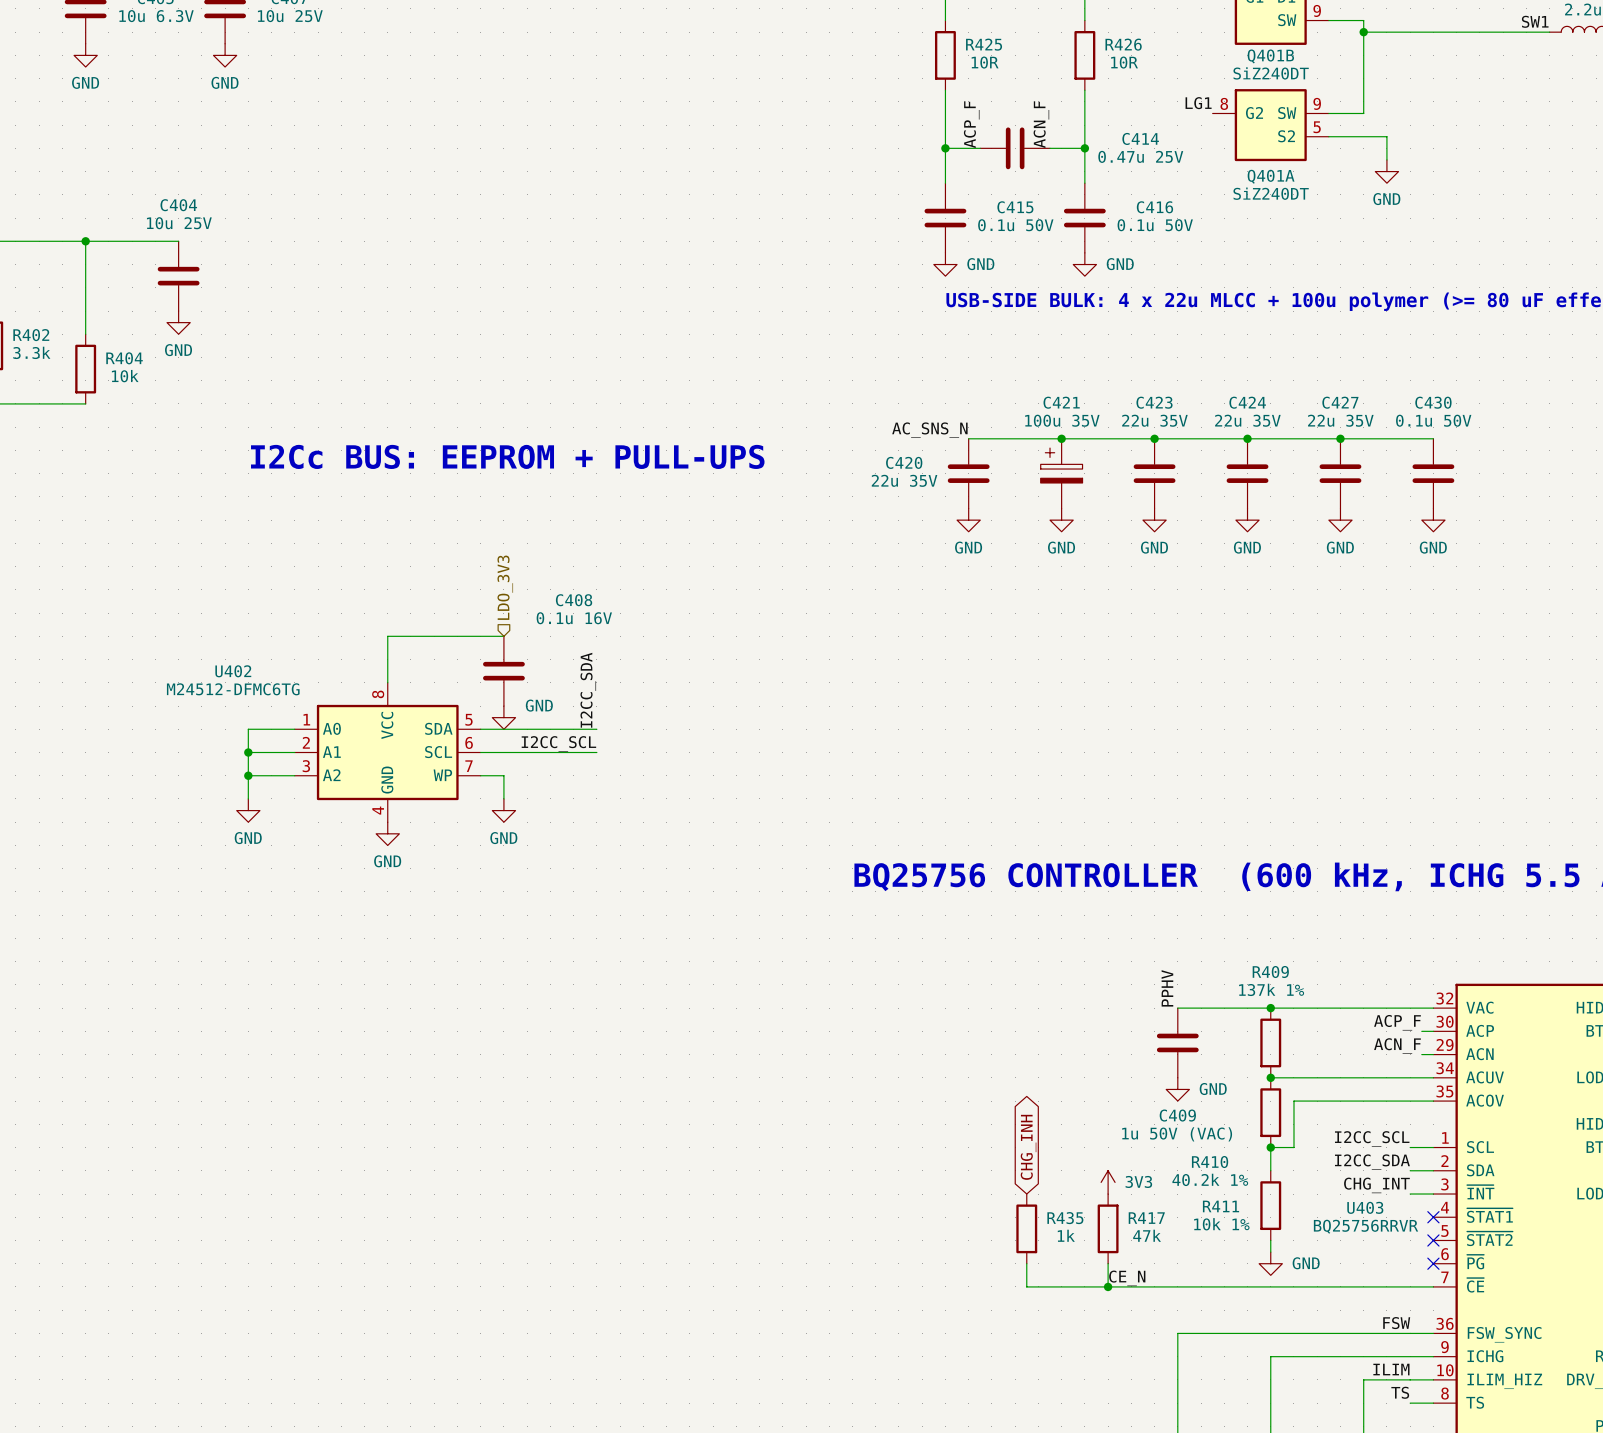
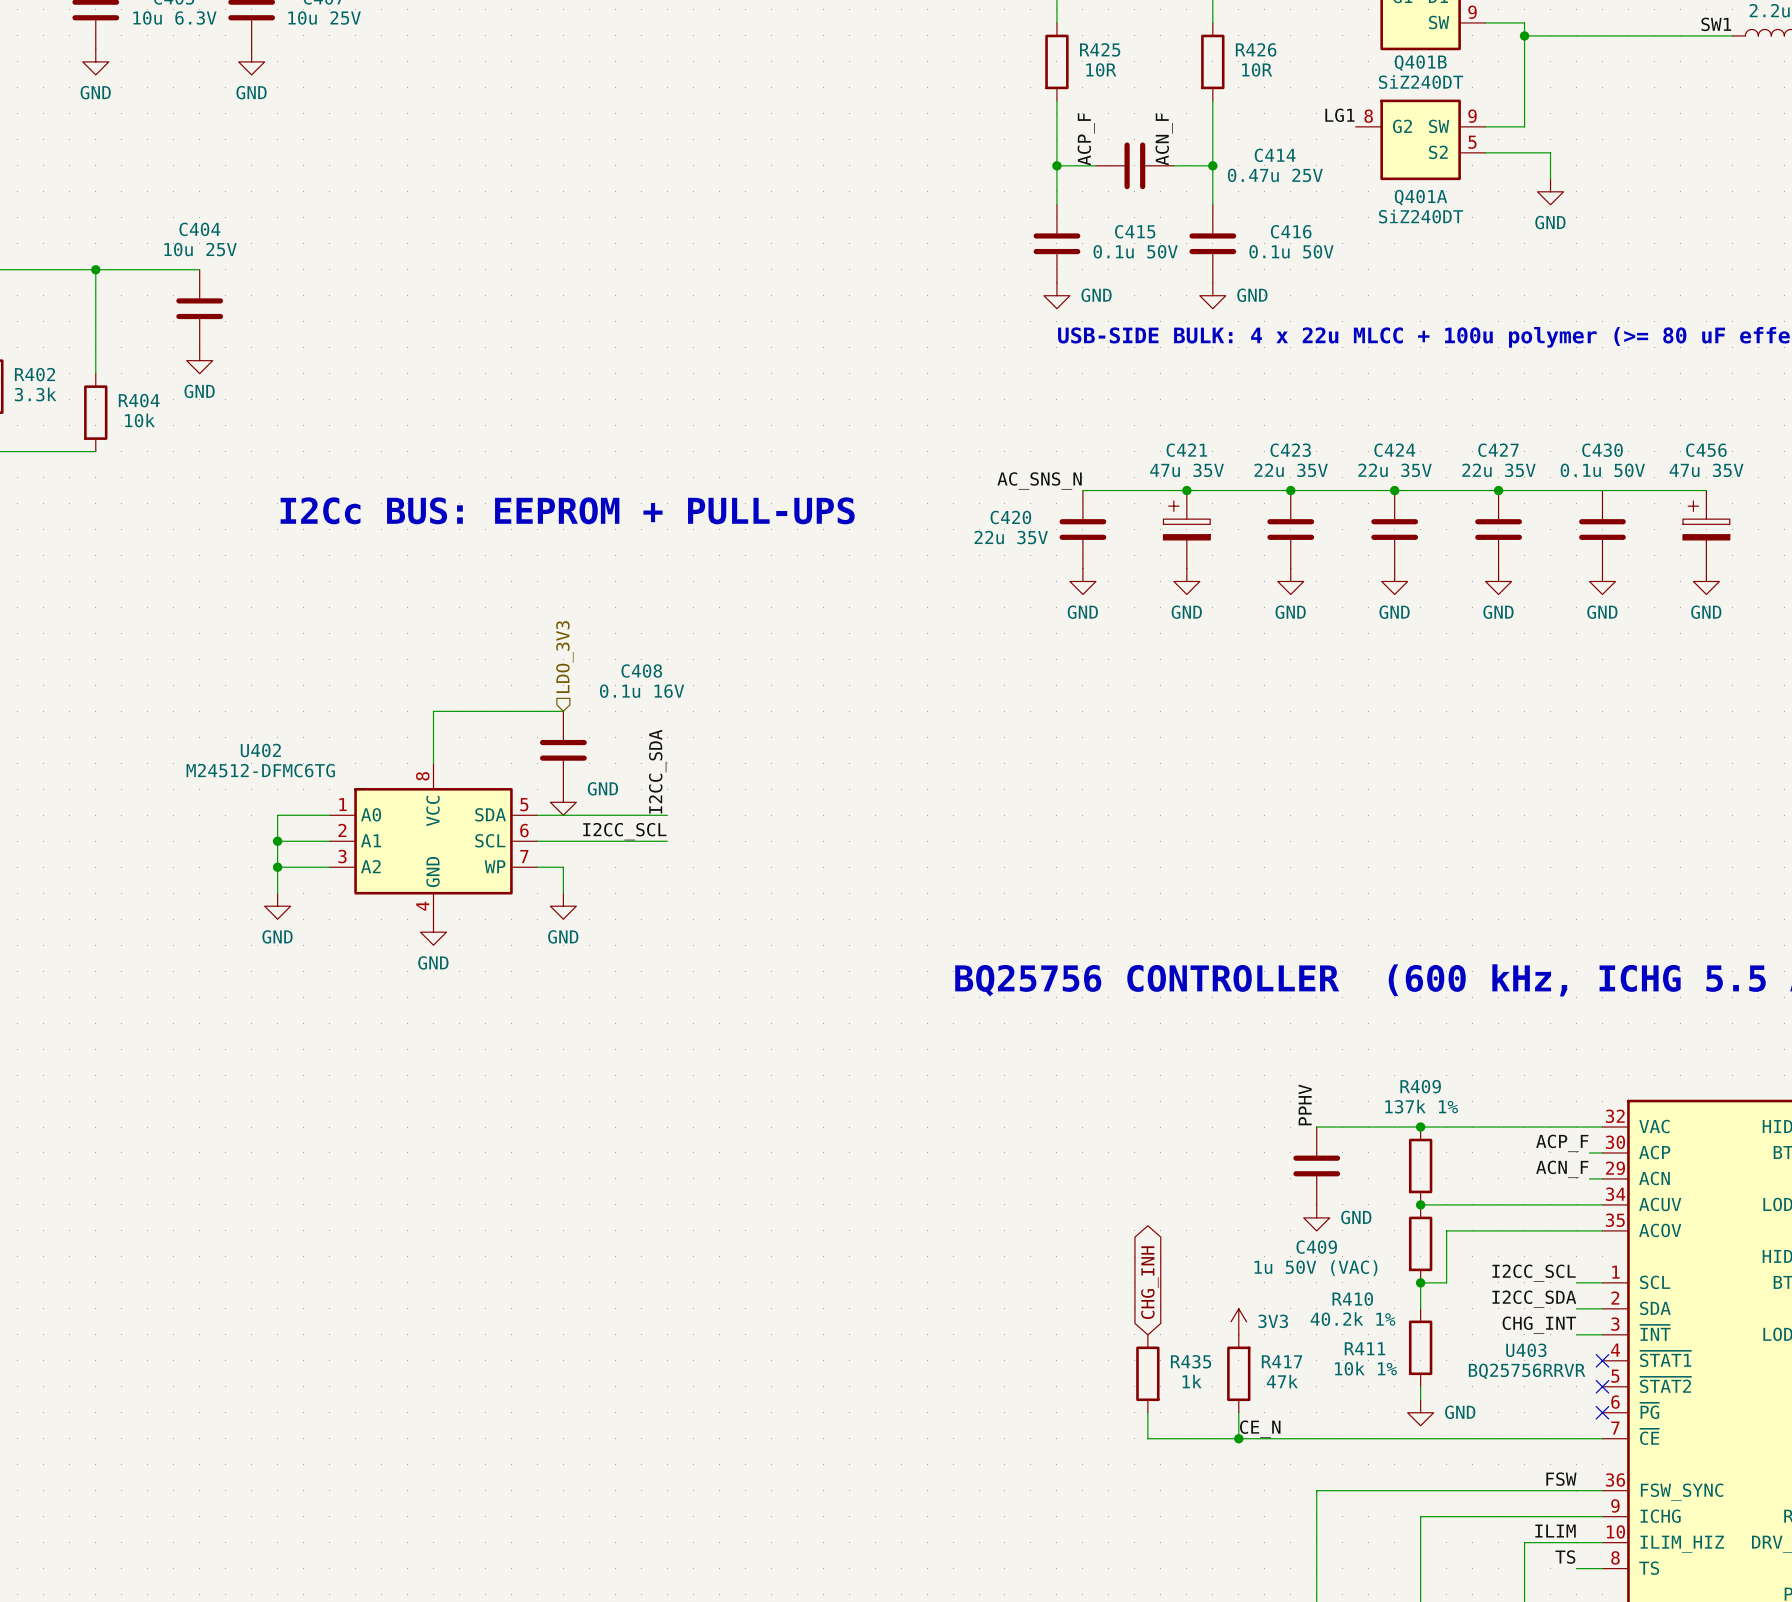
C421 value: 100u 35V (1062, 420) -> 47u 35V (1187, 470)
wire: none -> (1602, 490) (1706, 490)
C456: none -> 47u 35V (1706, 529)
power symbol: none -> GND (1706, 581)

